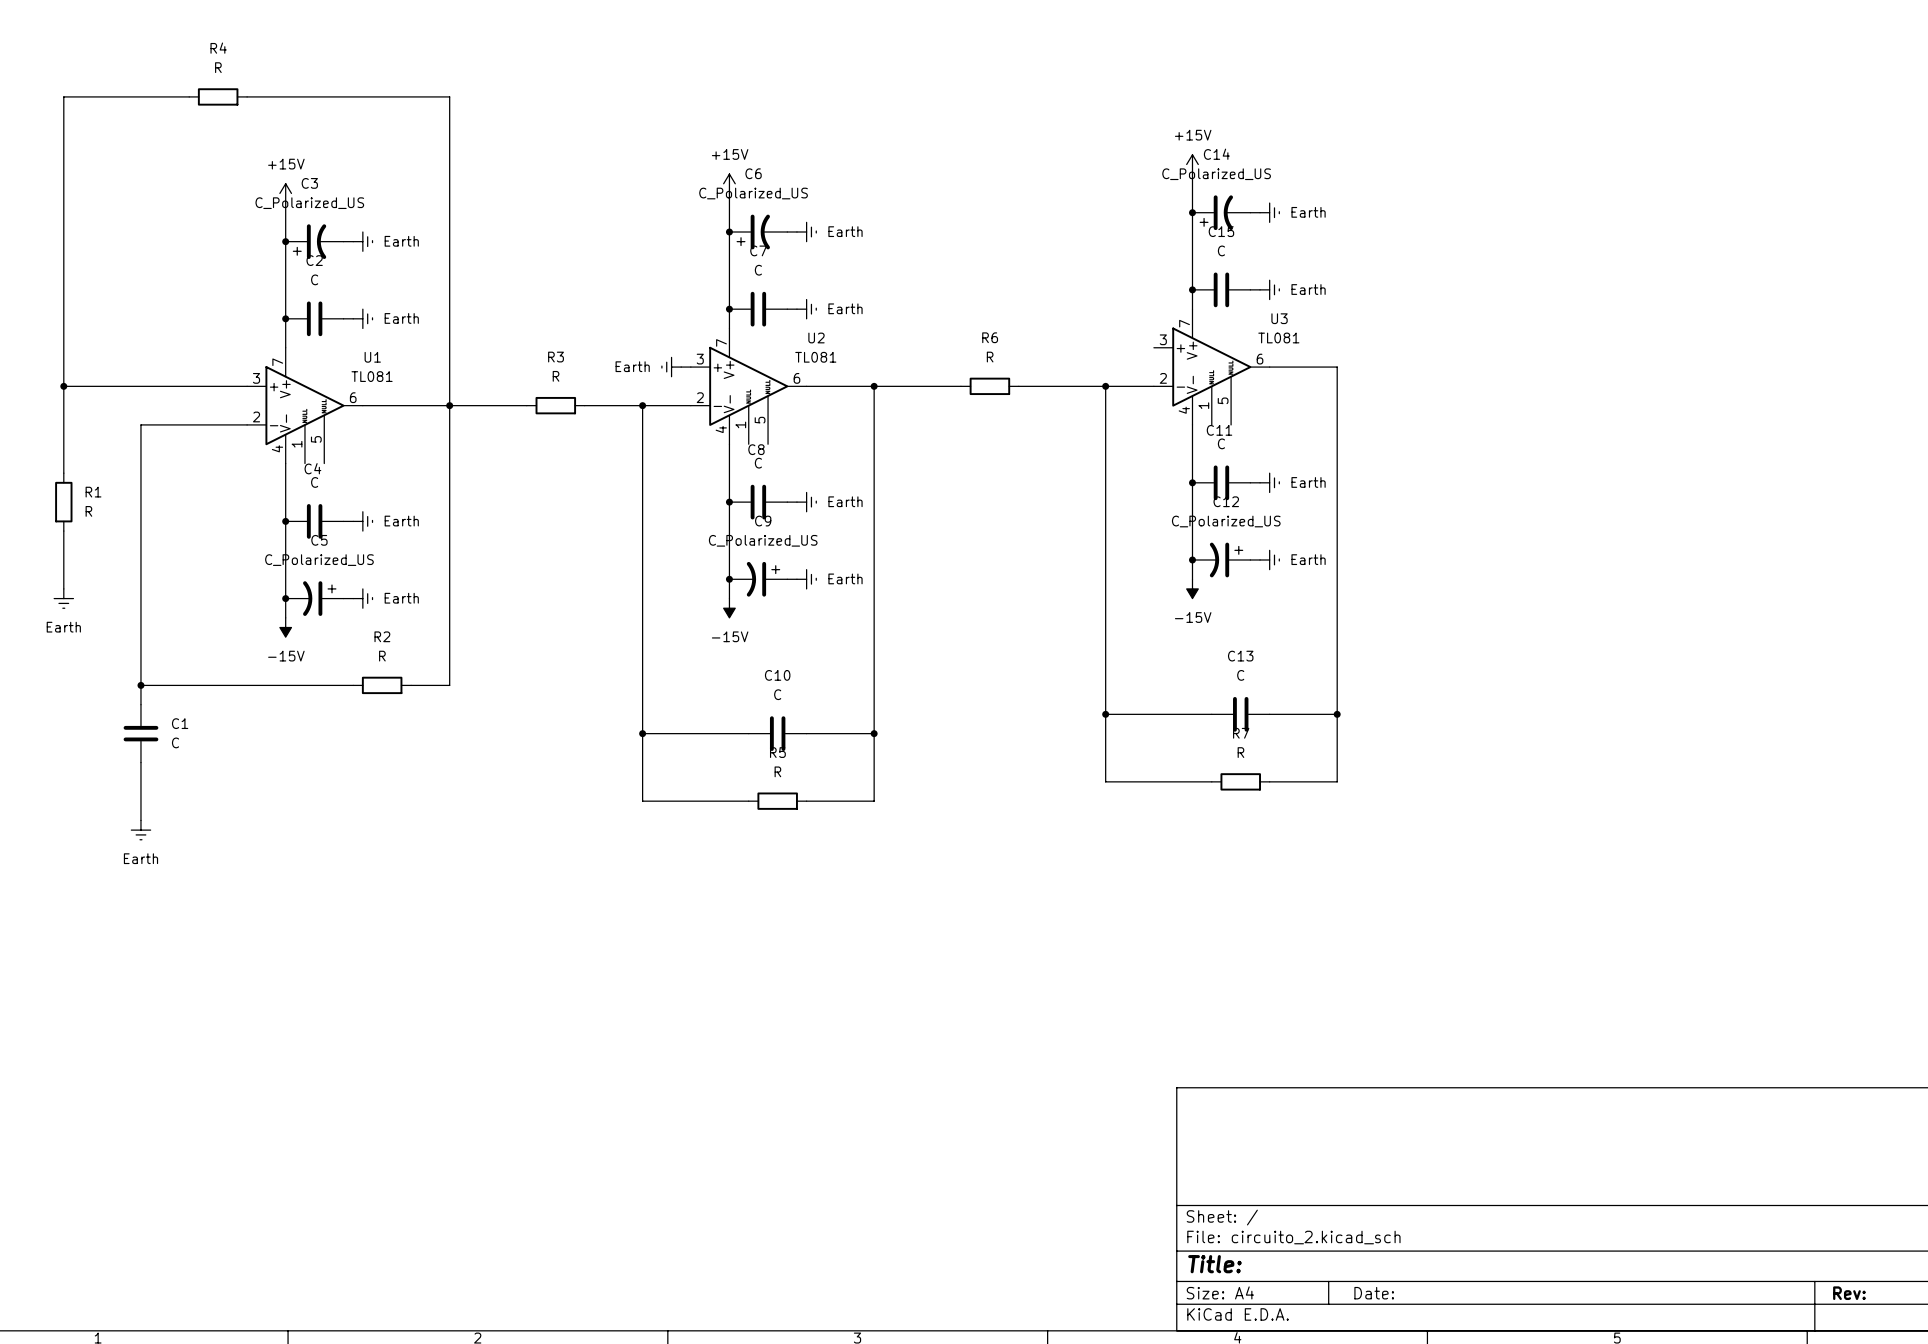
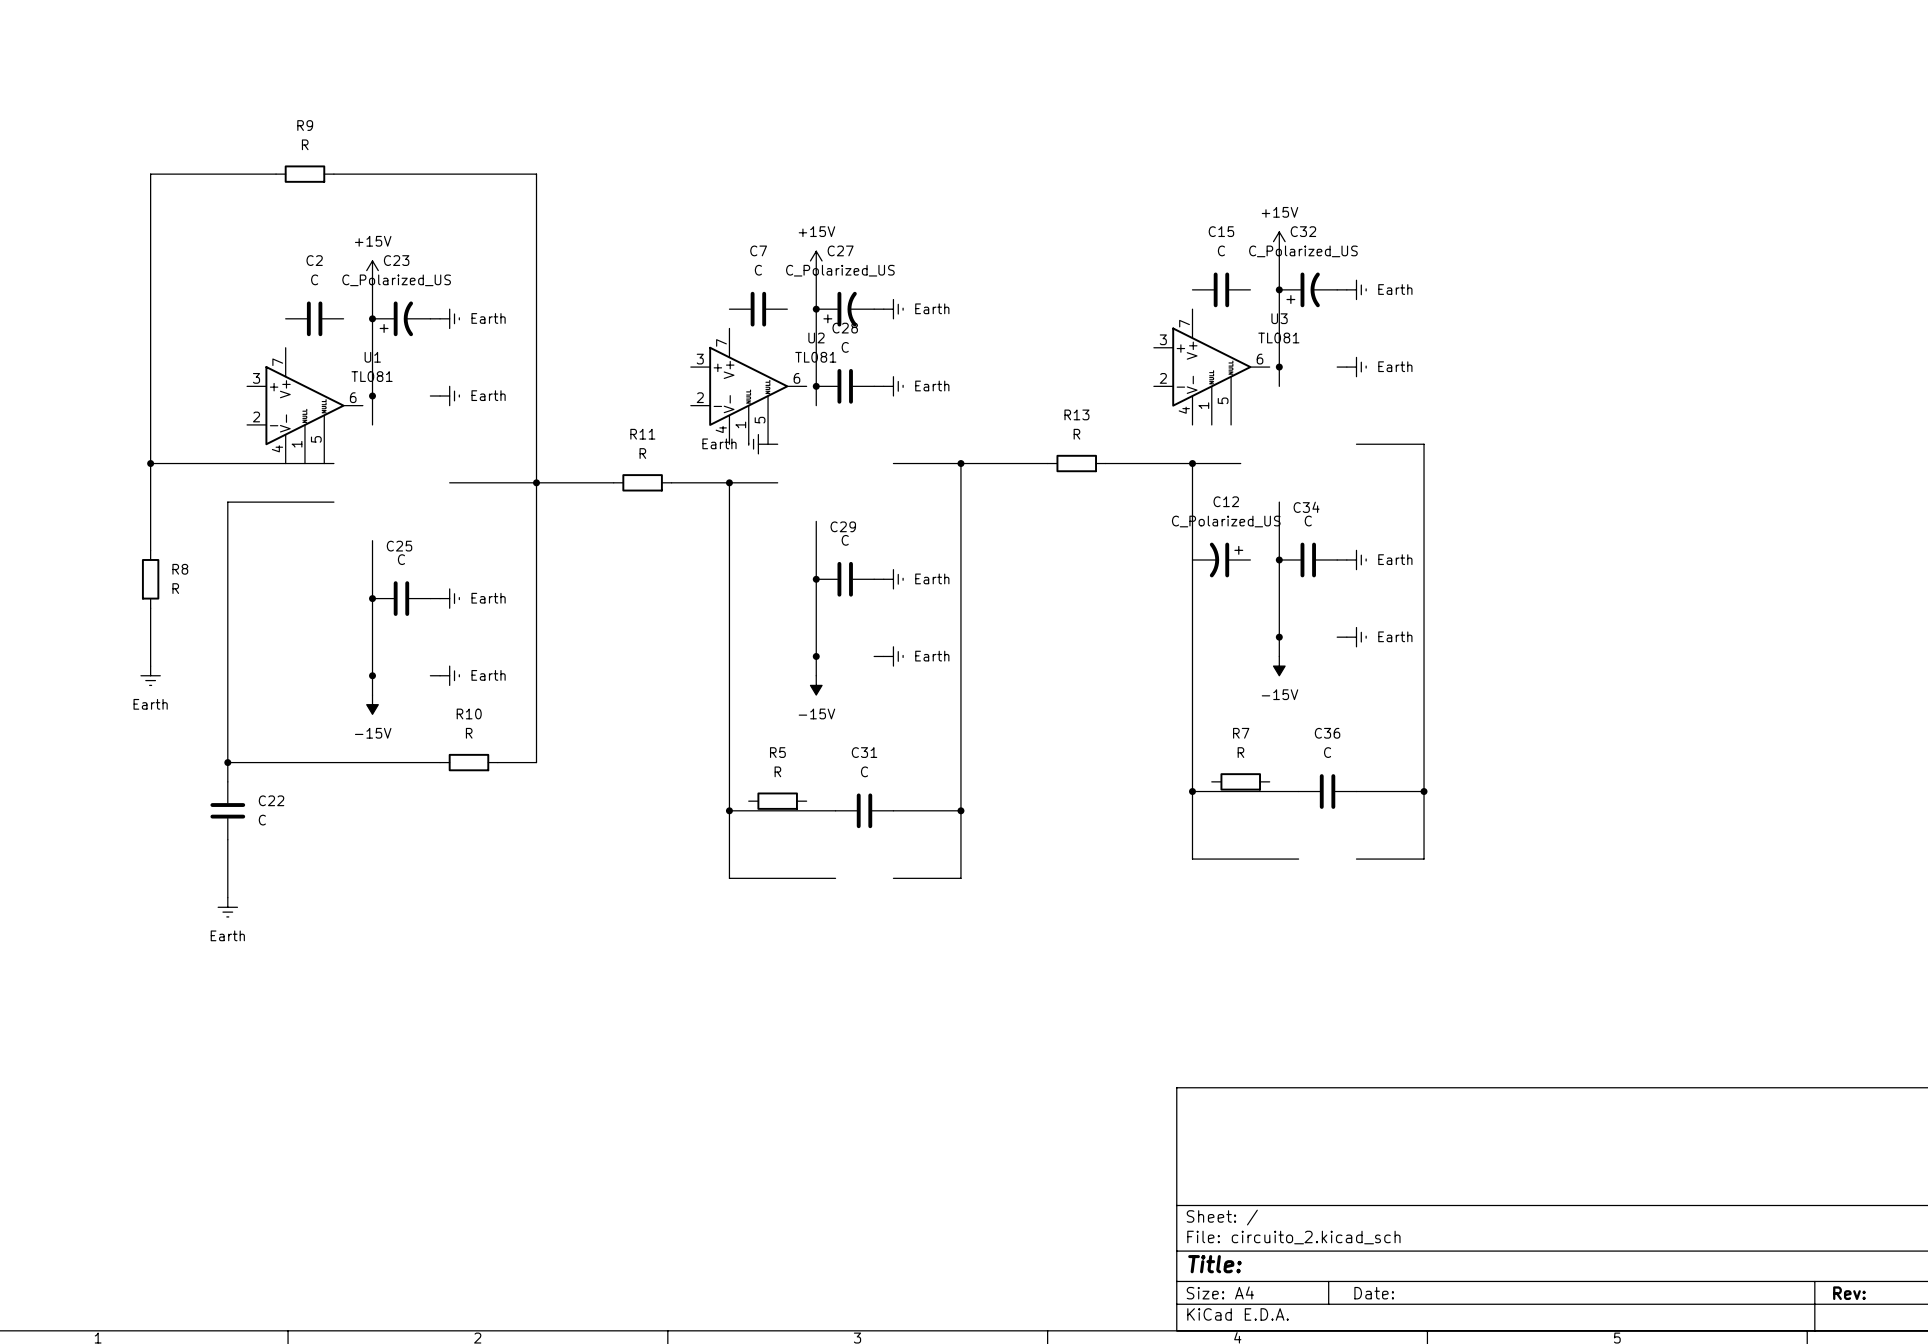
wire: (189, 96) (63, 96) (63, 473) -> (276, 174) (150, 174) (150, 550)
R4: R (218, 96) -> none
wire: (247, 96) (449, 96) (449, 685) (411, 685) -> (333, 174) (536, 174) (536, 762) (497, 762)
power symbol position: +15V (1192, 164) -> +15V (1279, 241)
R9: none -> R (304, 174)
wire: (1192, 174) (1192, 309) -> (1279, 251) (1279, 386)
power symbol position: +15V (729, 183) -> +15V (816, 260)
power symbol position: +15V (285, 193) -> +15V (372, 270)
wire: (729, 193) (729, 328) -> (816, 270) (816, 405)
wire: (285, 203) (285, 347) -> (372, 280) (372, 424)
junction: (1192, 212) -> none
C14: C_Polarized_US (1221, 212) -> none
wire: (1250, 212) (1260, 212) -> (1337, 289) (1346, 289)
power symbol: Earth (1269, 212) -> none
junction: (729, 232) -> none
C6: C_Polarized_US (758, 232) -> none
wire: (787, 232) (796, 232) -> (874, 309) (883, 309)
power symbol: Earth (806, 232) -> none
junction: (285, 241) -> none
C3: C_Polarized_US (314, 241) -> none
wire: (343, 241) (353, 241) -> (430, 318) (440, 318)
power symbol: Earth (362, 241) -> none
junction: (1192, 289) -> none
wire: (1250, 289) (1260, 289) -> (1337, 367) (1346, 367)
power symbol: Earth (1269, 289) -> none
junction: none -> (1279, 289)
C32: none -> C_Polarized_US (1308, 289)
power symbol: none -> Earth (1356, 289)
junction: (729, 309) -> none
wire: (787, 309) (796, 309) -> none
power symbol: Earth (806, 309) -> none
junction: none -> (816, 309)
C27: none -> C_Polarized_US (845, 309)
power symbol: none -> Earth (893, 309)
junction: (285, 318) -> none
wire: (343, 318) (353, 318) -> (430, 395) (440, 395)
power symbol: Earth (362, 318) -> none
junction: none -> (372, 318)
C23: none -> C_Polarized_US (401, 318)
power symbol: none -> Earth (449, 318)
power symbol: Earth (671, 367) -> none
wire: (681, 367) (690, 367) -> (768, 444) (777, 444)
wire: (1269, 367) (1337, 367) (1337, 781) (1269, 781) -> (1356, 444) (1424, 444) (1424, 859) (1356, 859)
junction: none -> (1279, 367)
power symbol: none -> Earth (1356, 367)
wire: (63, 386) (247, 386) -> (150, 463) (333, 463)
junction: (63, 386) -> none
wire: (806, 386) (874, 386) (874, 801) (806, 801) -> none
junction: none -> (816, 386)
C28: none -> C (845, 386)
junction: (874, 386) -> none
wire: (883, 386) (960, 386) -> none
power symbol: none -> Earth (893, 386)
R6: R (989, 386) -> none
wire: (1018, 386) (1153, 386) -> (1105, 463) (1240, 463)
wire: (1105, 386) (1105, 781) (1211, 781) -> none
junction: (1105, 386) -> none
junction: none -> (372, 395)
power symbol: none -> Earth (449, 395)
wire: (362, 405) (526, 405) -> (449, 482) (613, 482)
junction: (449, 405) -> none
R3: R (555, 405) -> none
wire: (584, 405) (690, 405) -> (671, 482) (777, 482)
wire: (642, 405) (642, 801) (748, 801) -> none
junction: (642, 405) -> none
wire: (247, 424) (140, 424) (140, 704) -> (333, 502) (227, 502) (227, 781)
wire: (1192, 424) (1192, 463) -> none
wire: (729, 444) (729, 482) -> none
power symbol: none -> Earth (758, 444)
junction: none -> (150, 463)
wire: (285, 463) (285, 617) -> (372, 540) (372, 695)
wire: none -> (893, 463) (1047, 463)
wire: none -> (960, 463) (960, 878) (893, 878)
junction: none -> (960, 463)
R13: none -> R (1076, 463)
junction: none -> (536, 482)
R11: none -> R (642, 482)
junction position: (1192, 482) -> (1192, 463)
C11: C (1221, 482) -> none
wire: (1250, 482) (1260, 482) -> (1337, 559) (1346, 559)
power symbol: Earth (1269, 482) -> none
R1: R (63, 502) -> none
junction position: (729, 502) -> (729, 482)
C8: C (758, 502) -> none
wire: (787, 502) (796, 502) -> (874, 579) (883, 579)
power symbol: Earth (806, 502) -> none
wire: none -> (1279, 502) (1279, 656)
junction: (285, 521) -> none
C4: C (314, 521) -> none
wire: (343, 521) (353, 521) -> (430, 598) (440, 598)
power symbol: Earth (362, 521) -> none
wire: none -> (816, 521) (816, 675)
wire: (63, 531) (63, 588) -> (150, 608) (150, 666)
junction: (1192, 559) -> none
wire: (1250, 559) (1260, 559) -> (1337, 637) (1346, 637)
power symbol: Earth (1269, 559) -> none
junction: none -> (1279, 559)
C34: none -> C (1308, 559)
power symbol: none -> Earth (1356, 559)
R8: none -> R (150, 579)
junction: (729, 579) -> none
C9: C_Polarized_US (758, 579) -> none
wire: (787, 579) (796, 579) -> (874, 656) (883, 656)
power symbol: Earth (806, 579) -> none
junction: none -> (816, 579)
C29: none -> C (845, 579)
power symbol: none -> Earth (893, 579)
wire: none -> (1192, 579) (1192, 859) (1298, 859)
power symbol position: -15V (1192, 588) -> -15V (1279, 666)
power symbol: Earth (63, 598) -> none
junction: (285, 598) -> none
C5: C_Polarized_US (314, 598) -> none
wire: (343, 598) (353, 598) -> (430, 675) (440, 675)
power symbol: Earth (362, 598) -> none
junction: none -> (372, 598)
C25: none -> C (401, 598)
power symbol: none -> Earth (449, 598)
wire: none -> (729, 598) (729, 878) (835, 878)
power symbol position: -15V (729, 608) -> -15V (816, 685)
power symbol position: -15V (285, 627) -> -15V (372, 704)
junction: none -> (1279, 637)
power symbol: none -> Earth (1356, 637)
junction: none -> (816, 656)
power symbol: none -> Earth (893, 656)
power symbol: none -> Earth (150, 675)
junction: none -> (372, 675)
power symbol: none -> Earth (449, 675)
wire: (140, 685) (353, 685) -> (227, 762) (440, 762)
junction: (140, 685) -> none
R2: R (382, 685) -> none
wire: (1105, 714) (1211, 714) -> (1192, 791) (1298, 791)
junction: (1105, 714) -> none
C13: C (1240, 714) -> none
wire: (1269, 714) (1337, 714) -> (1356, 791) (1424, 791)
junction: (1337, 714) -> none
C1: C (140, 733) -> none
wire: (642, 733) (748, 733) -> (729, 810) (835, 810)
junction: (642, 733) -> none
C10: C (777, 733) -> none
wire: (806, 733) (874, 733) -> (893, 810) (960, 810)
junction: (874, 733) -> none
wire: (140, 762) (140, 820) -> (227, 839) (227, 897)
junction: none -> (227, 762)
R10: none -> R (468, 762)
junction: none -> (1192, 791)
C36: none -> C (1327, 791)
junction: none -> (1424, 791)
C22: none -> C (227, 810)
junction: none -> (729, 810)
C31: none -> C (864, 810)
junction: none -> (960, 810)
power symbol: Earth (140, 830) -> none
power symbol: none -> Earth (227, 907)

